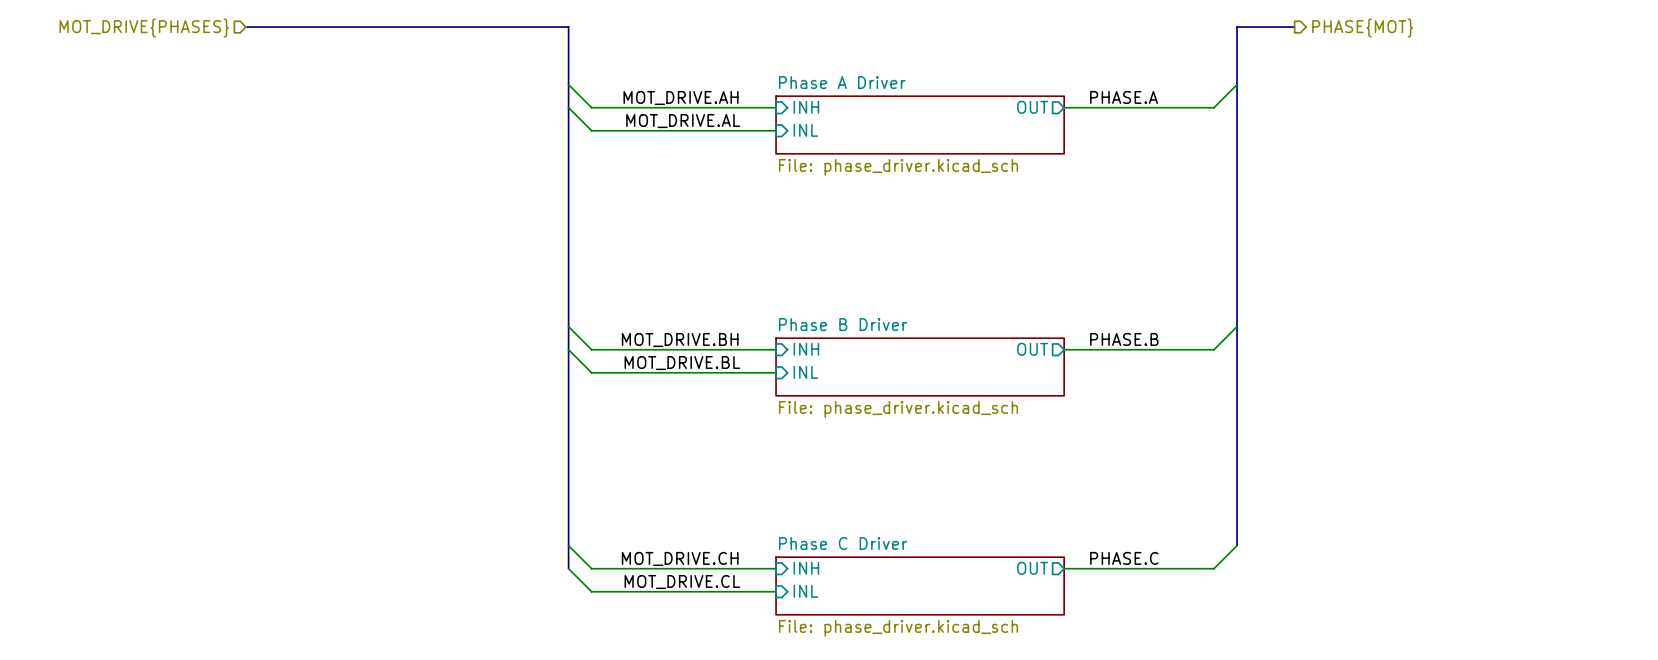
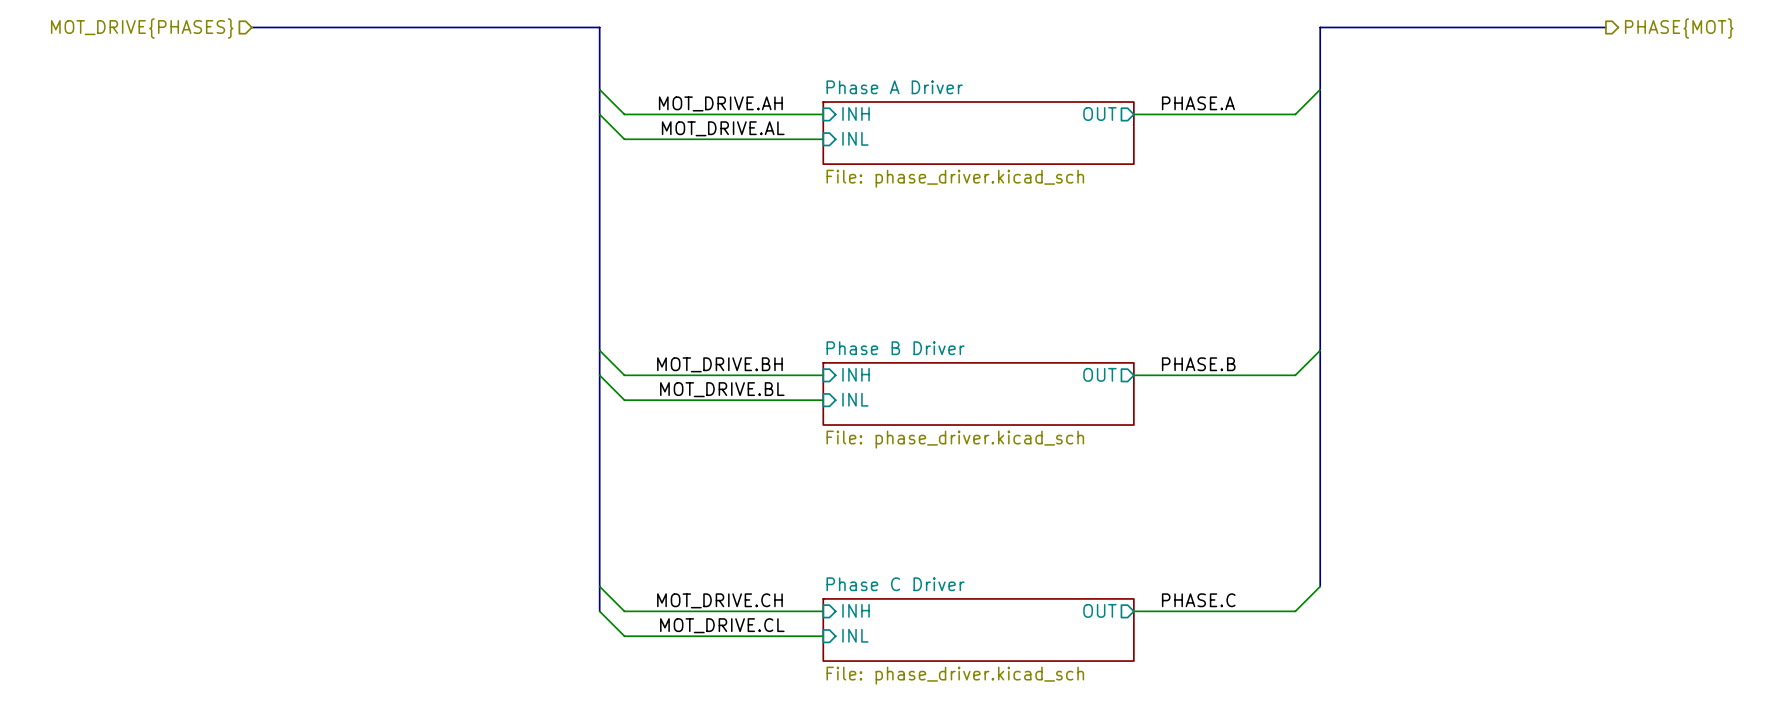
bus: none -> (1382, 27) (1605, 27)
hierarchical label position: PHASE{MOT} (1362, 27) -> PHASE{MOT} (1679, 28)

